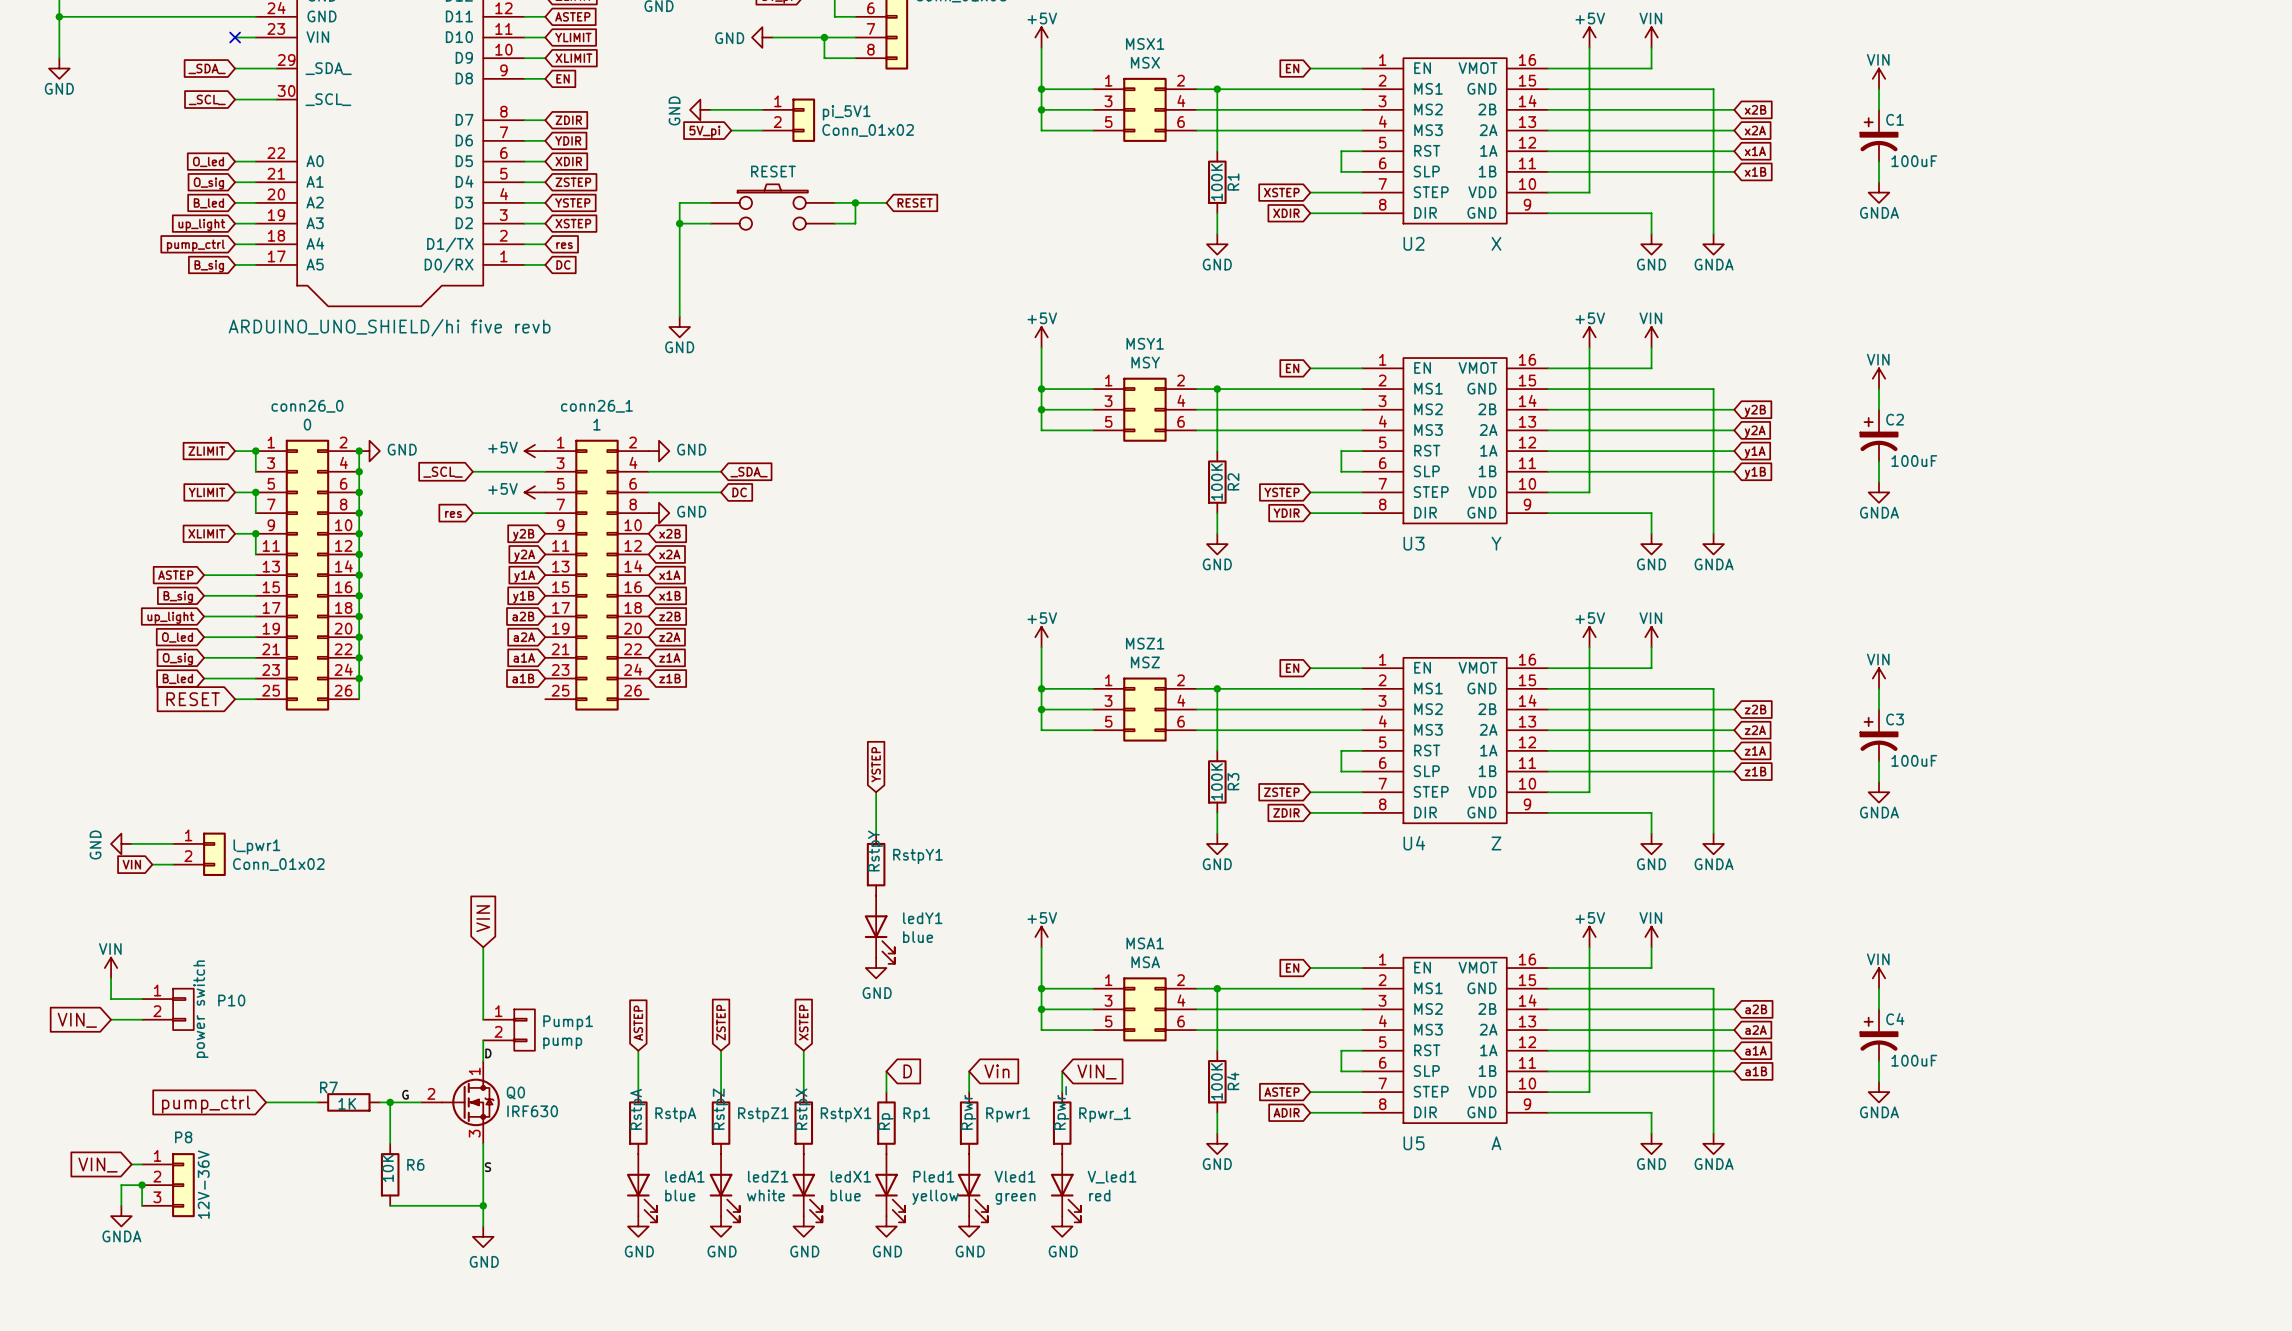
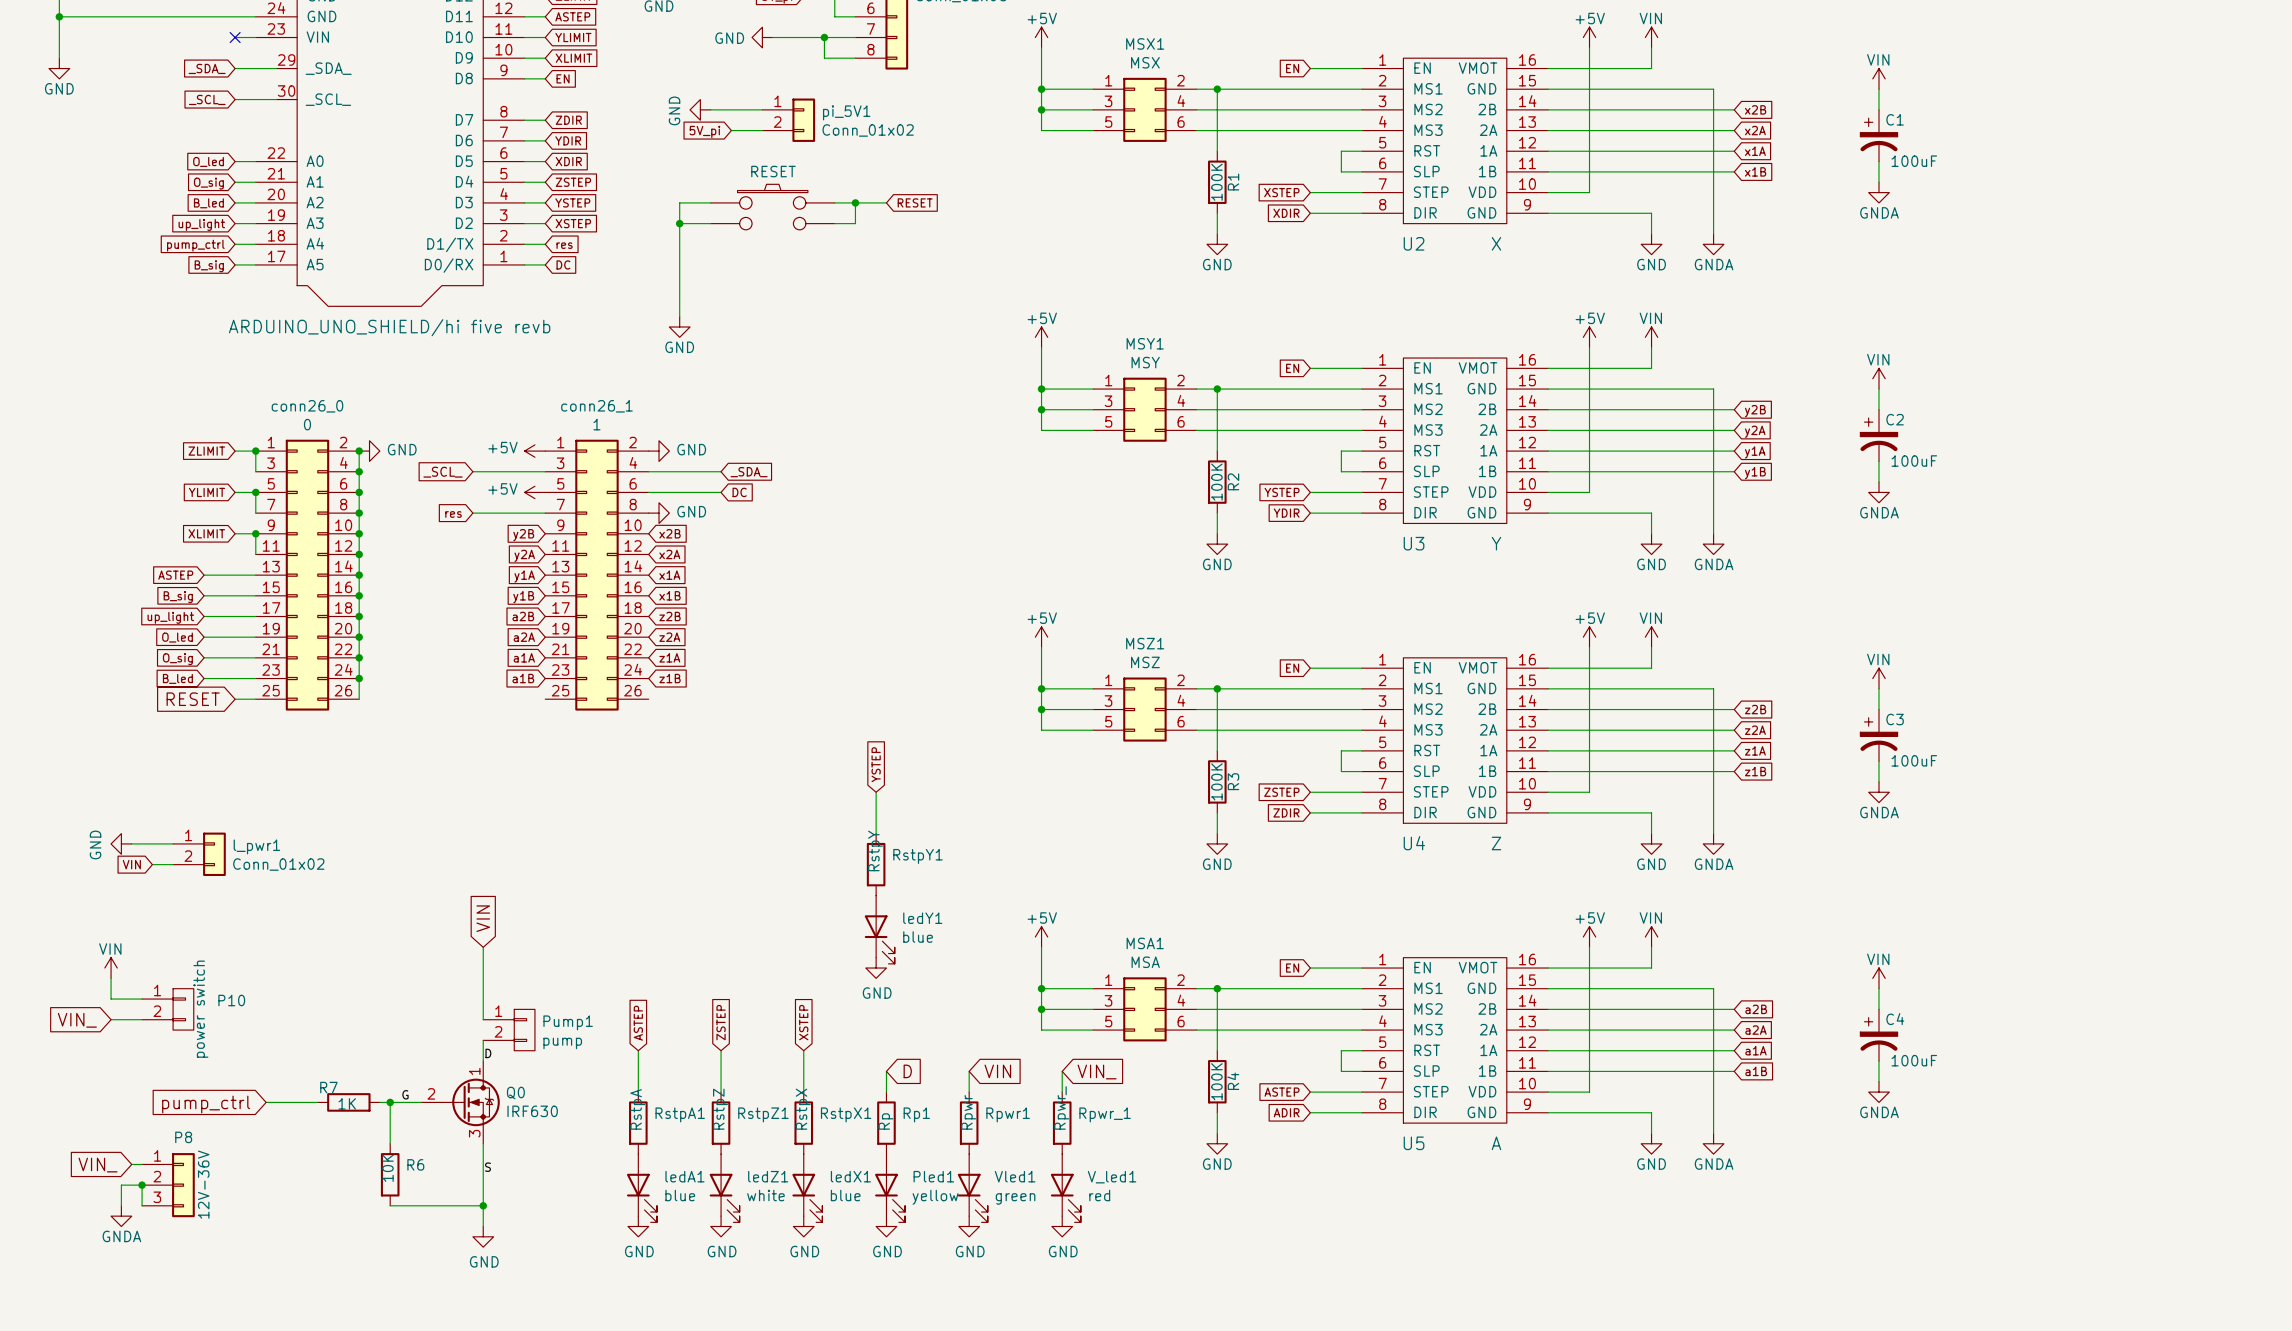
global label: Vin (996, 1071) -> VIN (997, 1071)
RstpA name: RstpA (675, 1114) -> RstpA1 (680, 1114)

